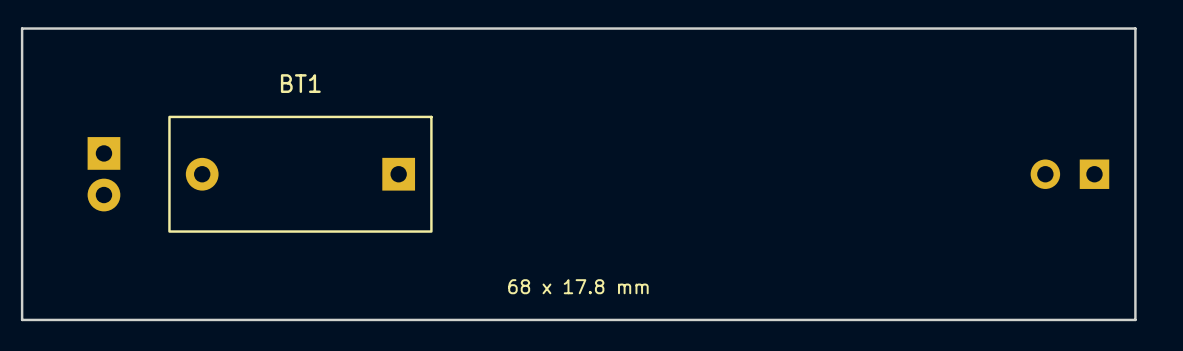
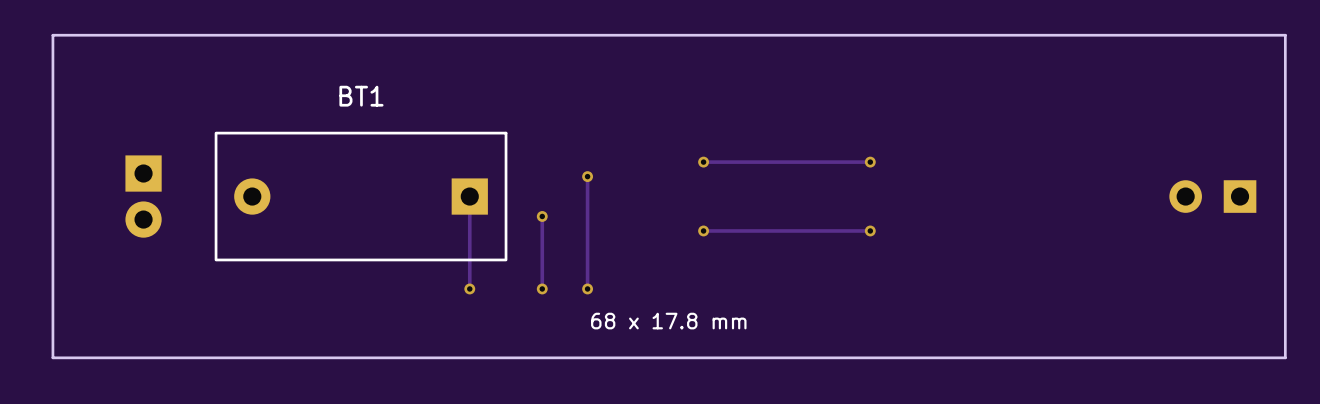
via: none -> (703, 162)
track: none -> (870, 162) (703, 162)
via: none -> (870, 162)
track: none -> (587, 176) (587, 288)
via: none -> (587, 176)
track: none -> (469, 196) (469, 288)
track: none -> (542, 216) (542, 288)
via: none -> (542, 216)
via: none -> (703, 230)
track: none -> (870, 230) (703, 230)
via: none -> (870, 230)
via: none -> (469, 288)
via: none -> (542, 288)
via: none -> (587, 288)

